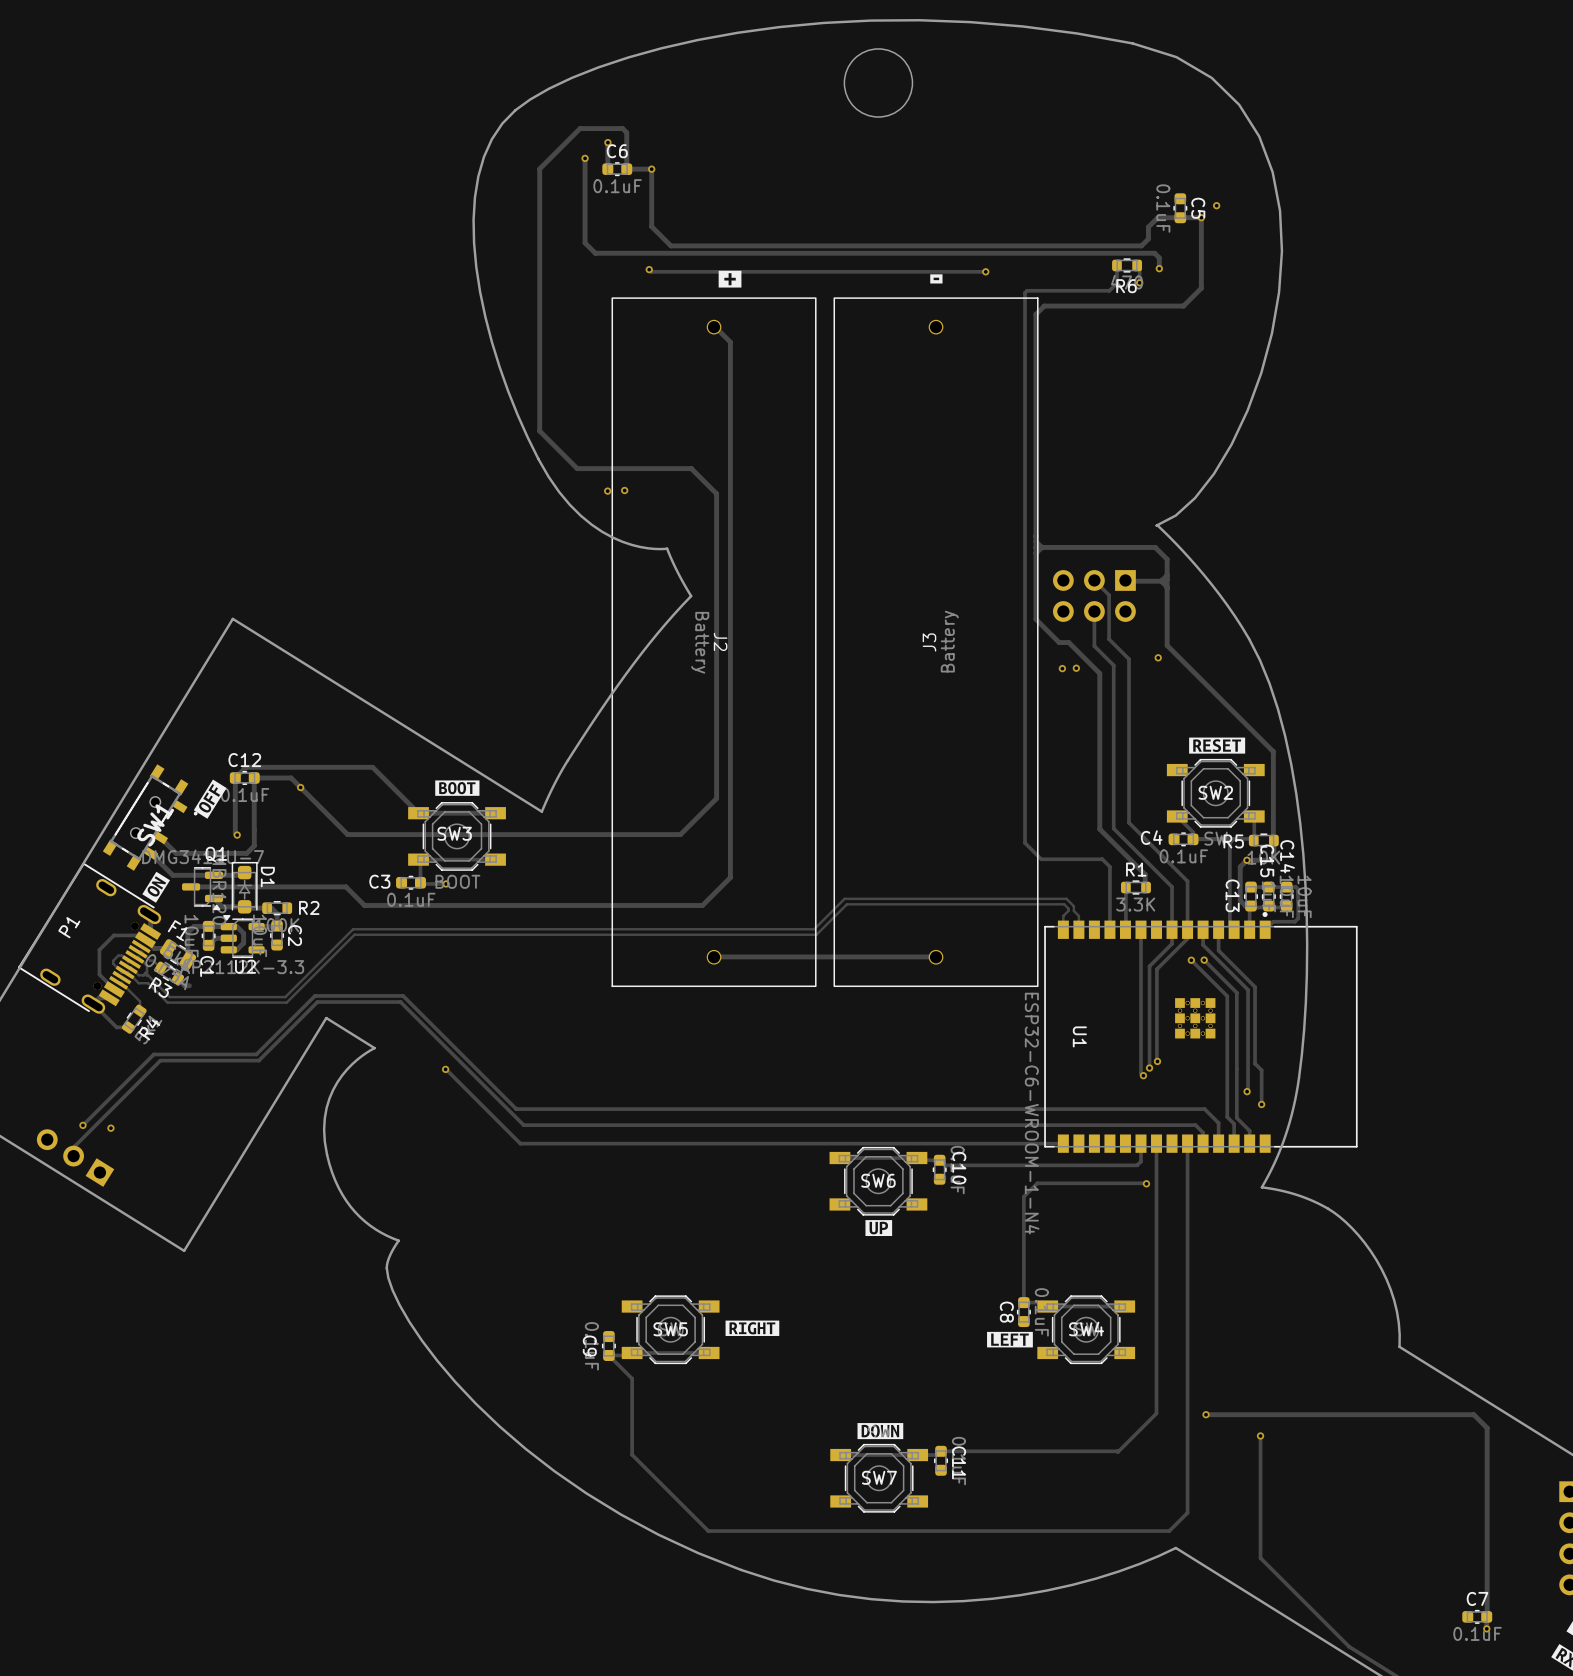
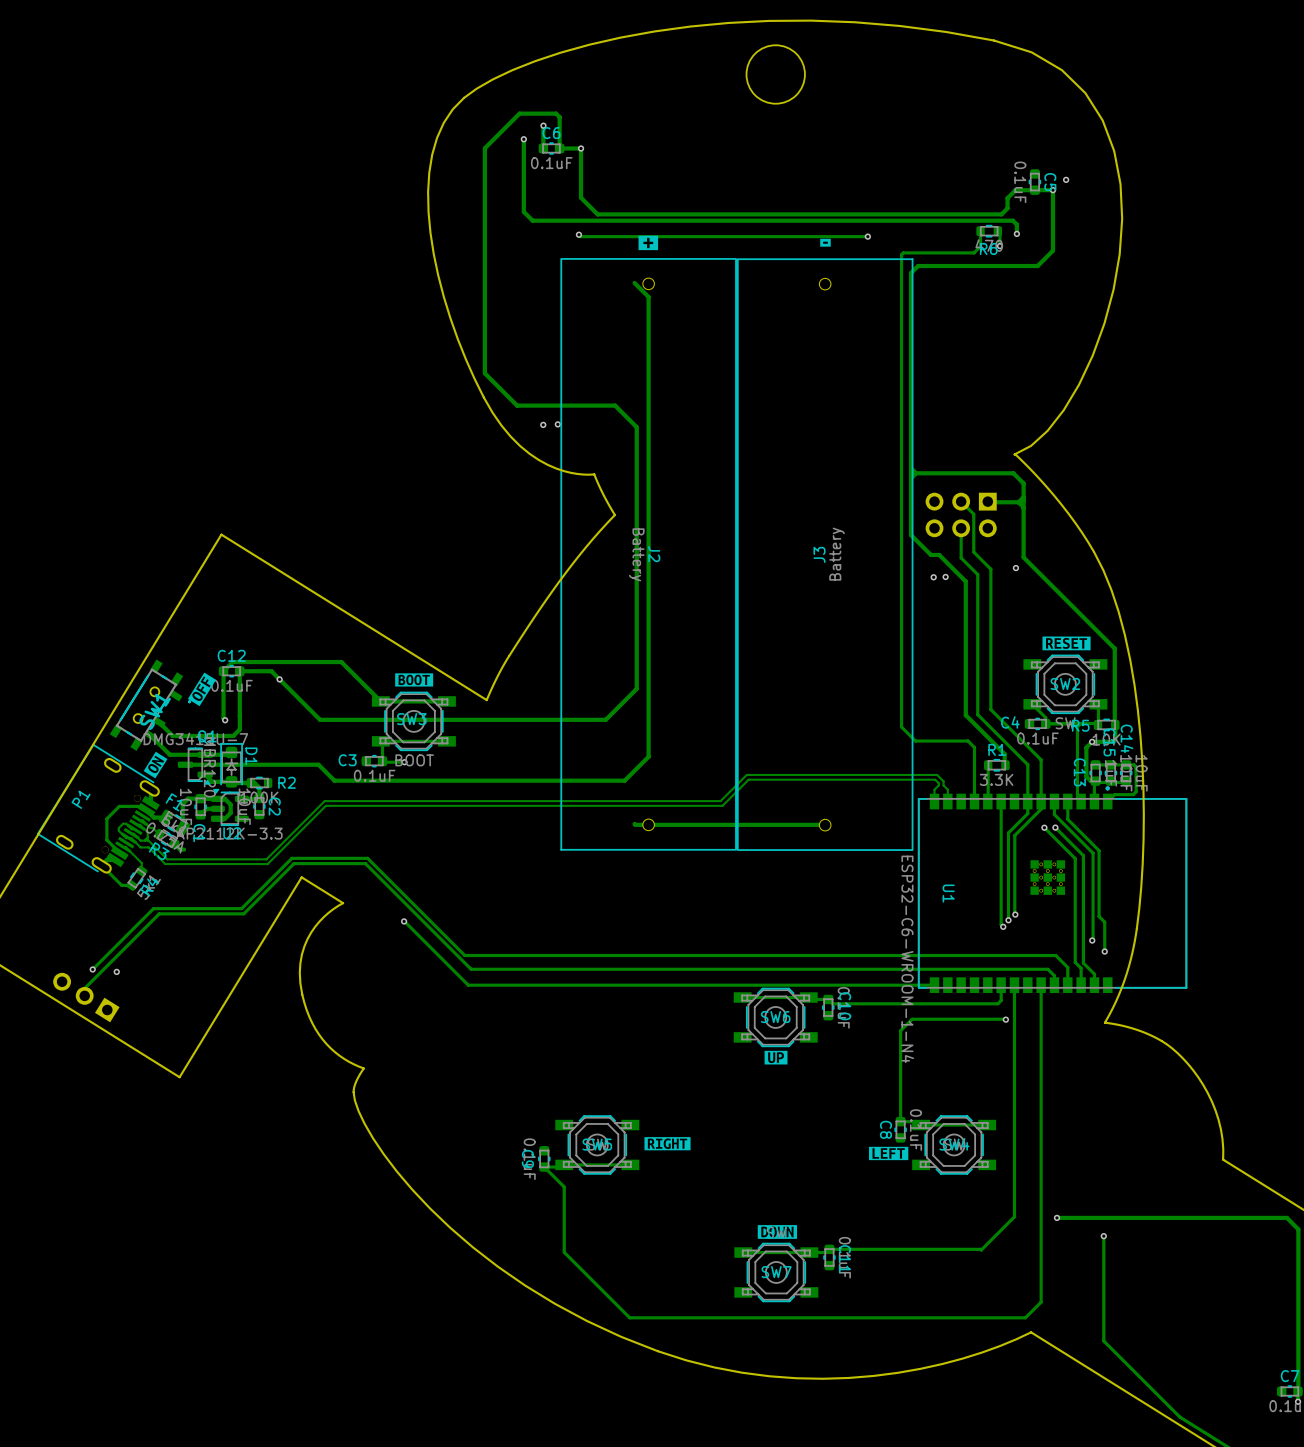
J2 position: (714, 642) -> (648, 554)

